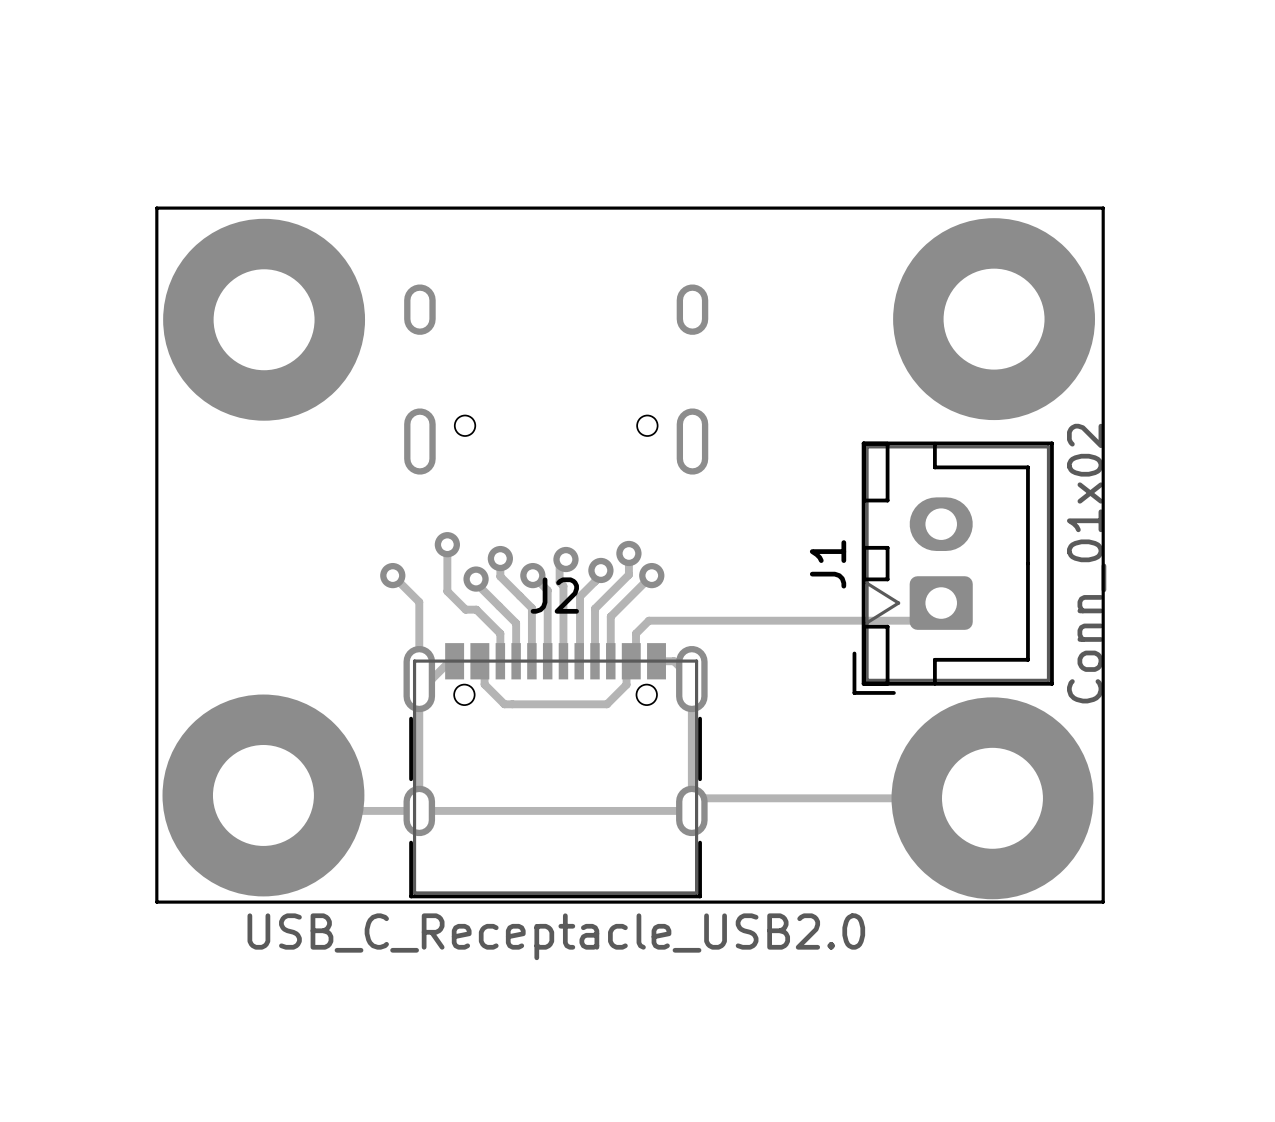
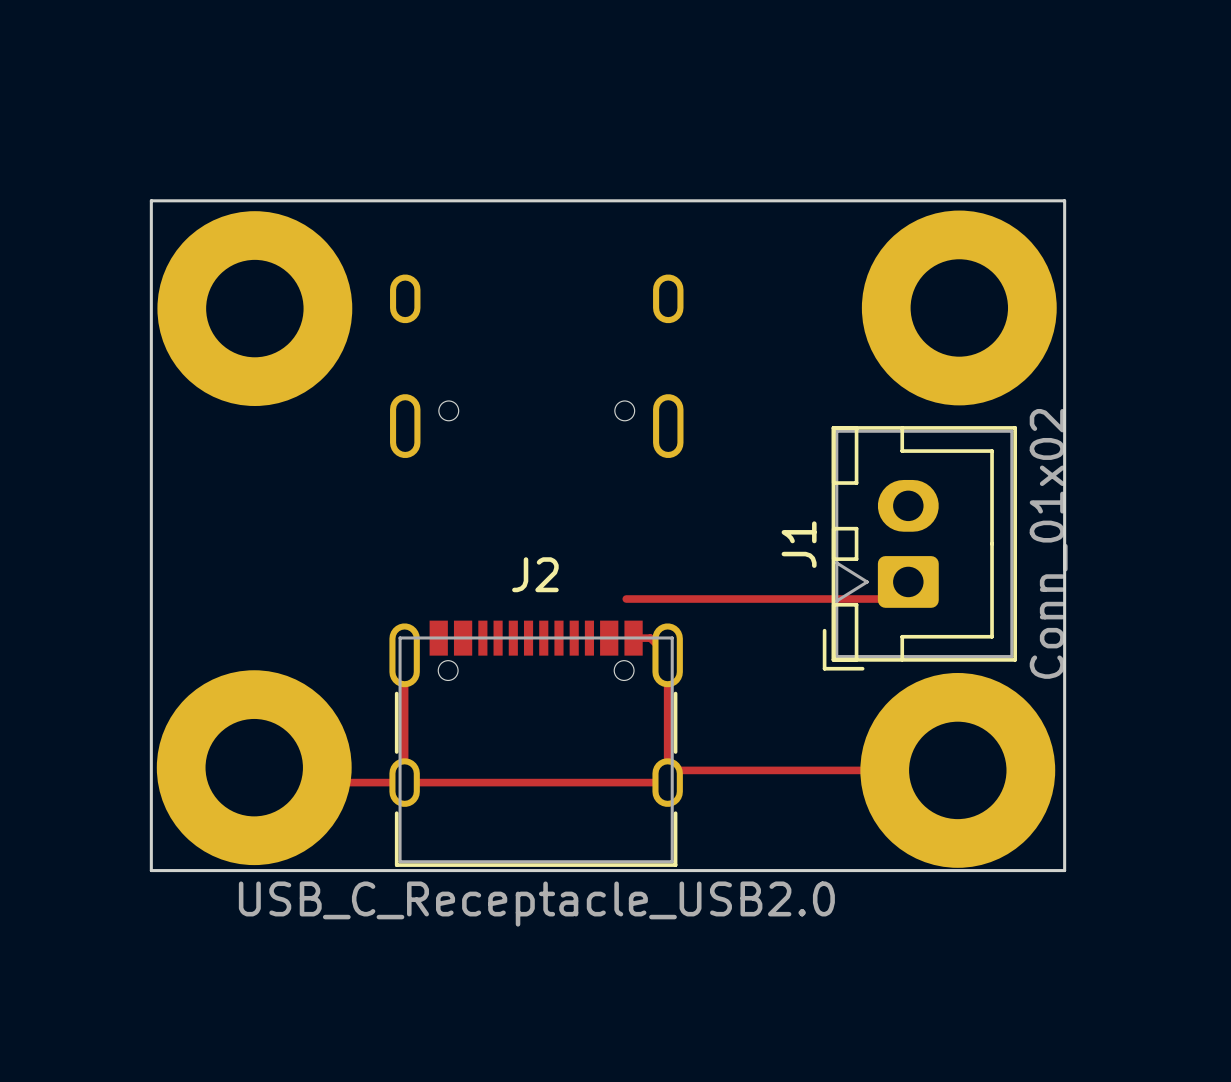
track: (447, 544) (447, 591) (465, 609) (476, 609) (500, 633) (500, 661) -> none
via: (447, 544) -> none
track: (628, 553) (628, 574) (595, 608) (595, 661) -> none
via: (628, 553) -> none
track: (500, 558) (500, 576) (531, 608) (531, 661) -> none
via: (500, 558) -> none
track: (565, 559) (559, 565) (559, 582) (563, 586) (563, 661) -> none
via: (565, 559) -> none
track: (600, 570) (600, 575) (580, 596) (580, 660) -> none
via: (600, 570) -> none
track: (392, 575) (419, 602) (419, 679) (432, 679) (449, 661) (459, 661) -> none
via: (392, 575) -> none
track: (532, 575) (547, 590) (547, 661) -> none
via: (532, 575) -> none
track: (651, 575) (610, 616) (610, 661) -> none
via: (651, 575) -> none
track: (476, 579) (476, 583) (516, 623) (516, 661) -> none
via: (476, 579) -> none
track: (648, 620) (636, 633) (636, 661) (626, 661) (626, 684) (606, 704) (504, 704) (484, 684) (484, 661) (475, 661) -> none

